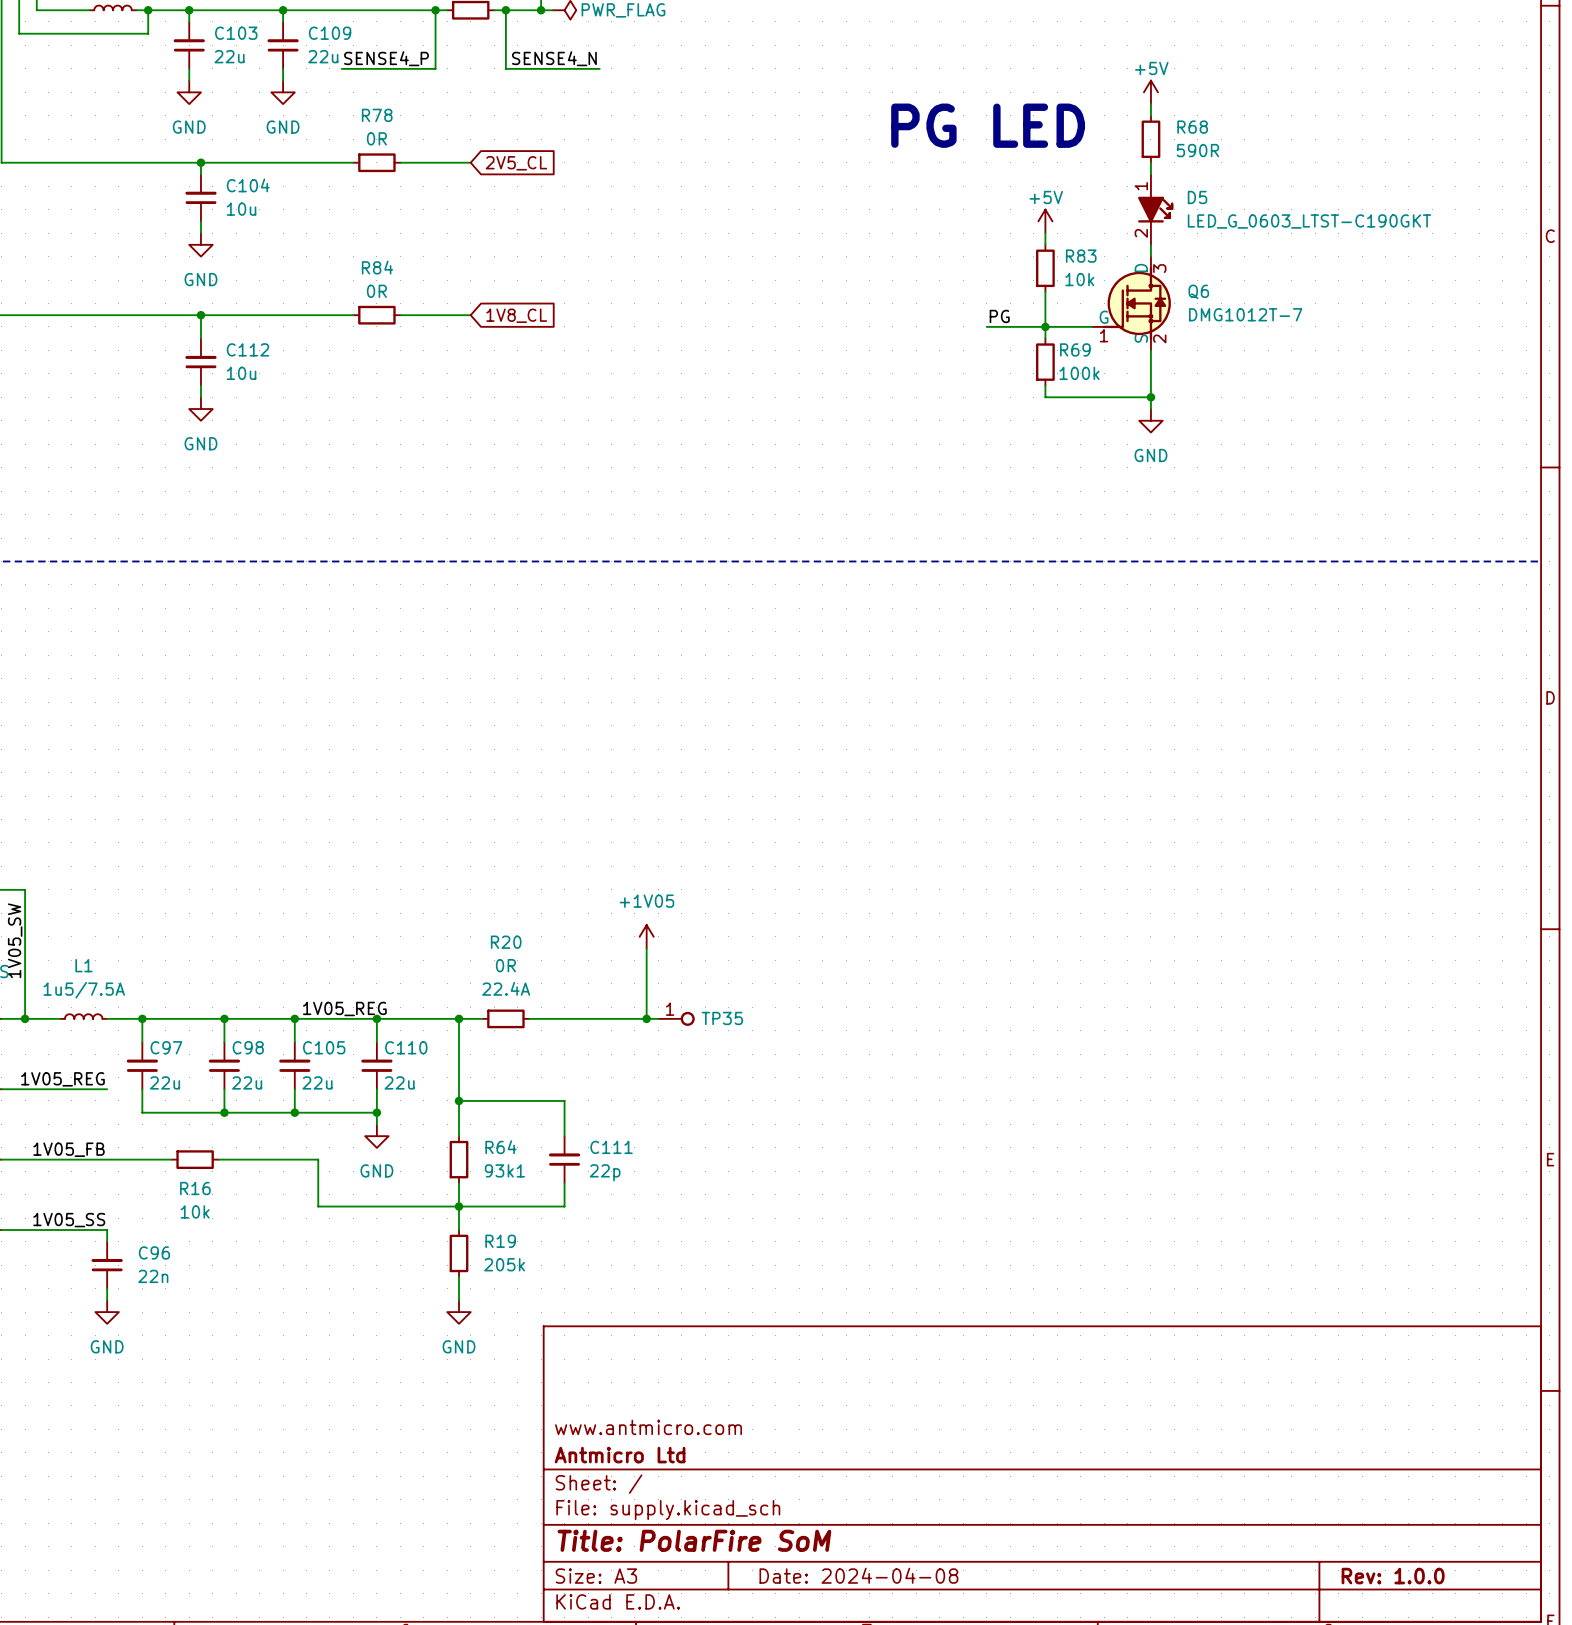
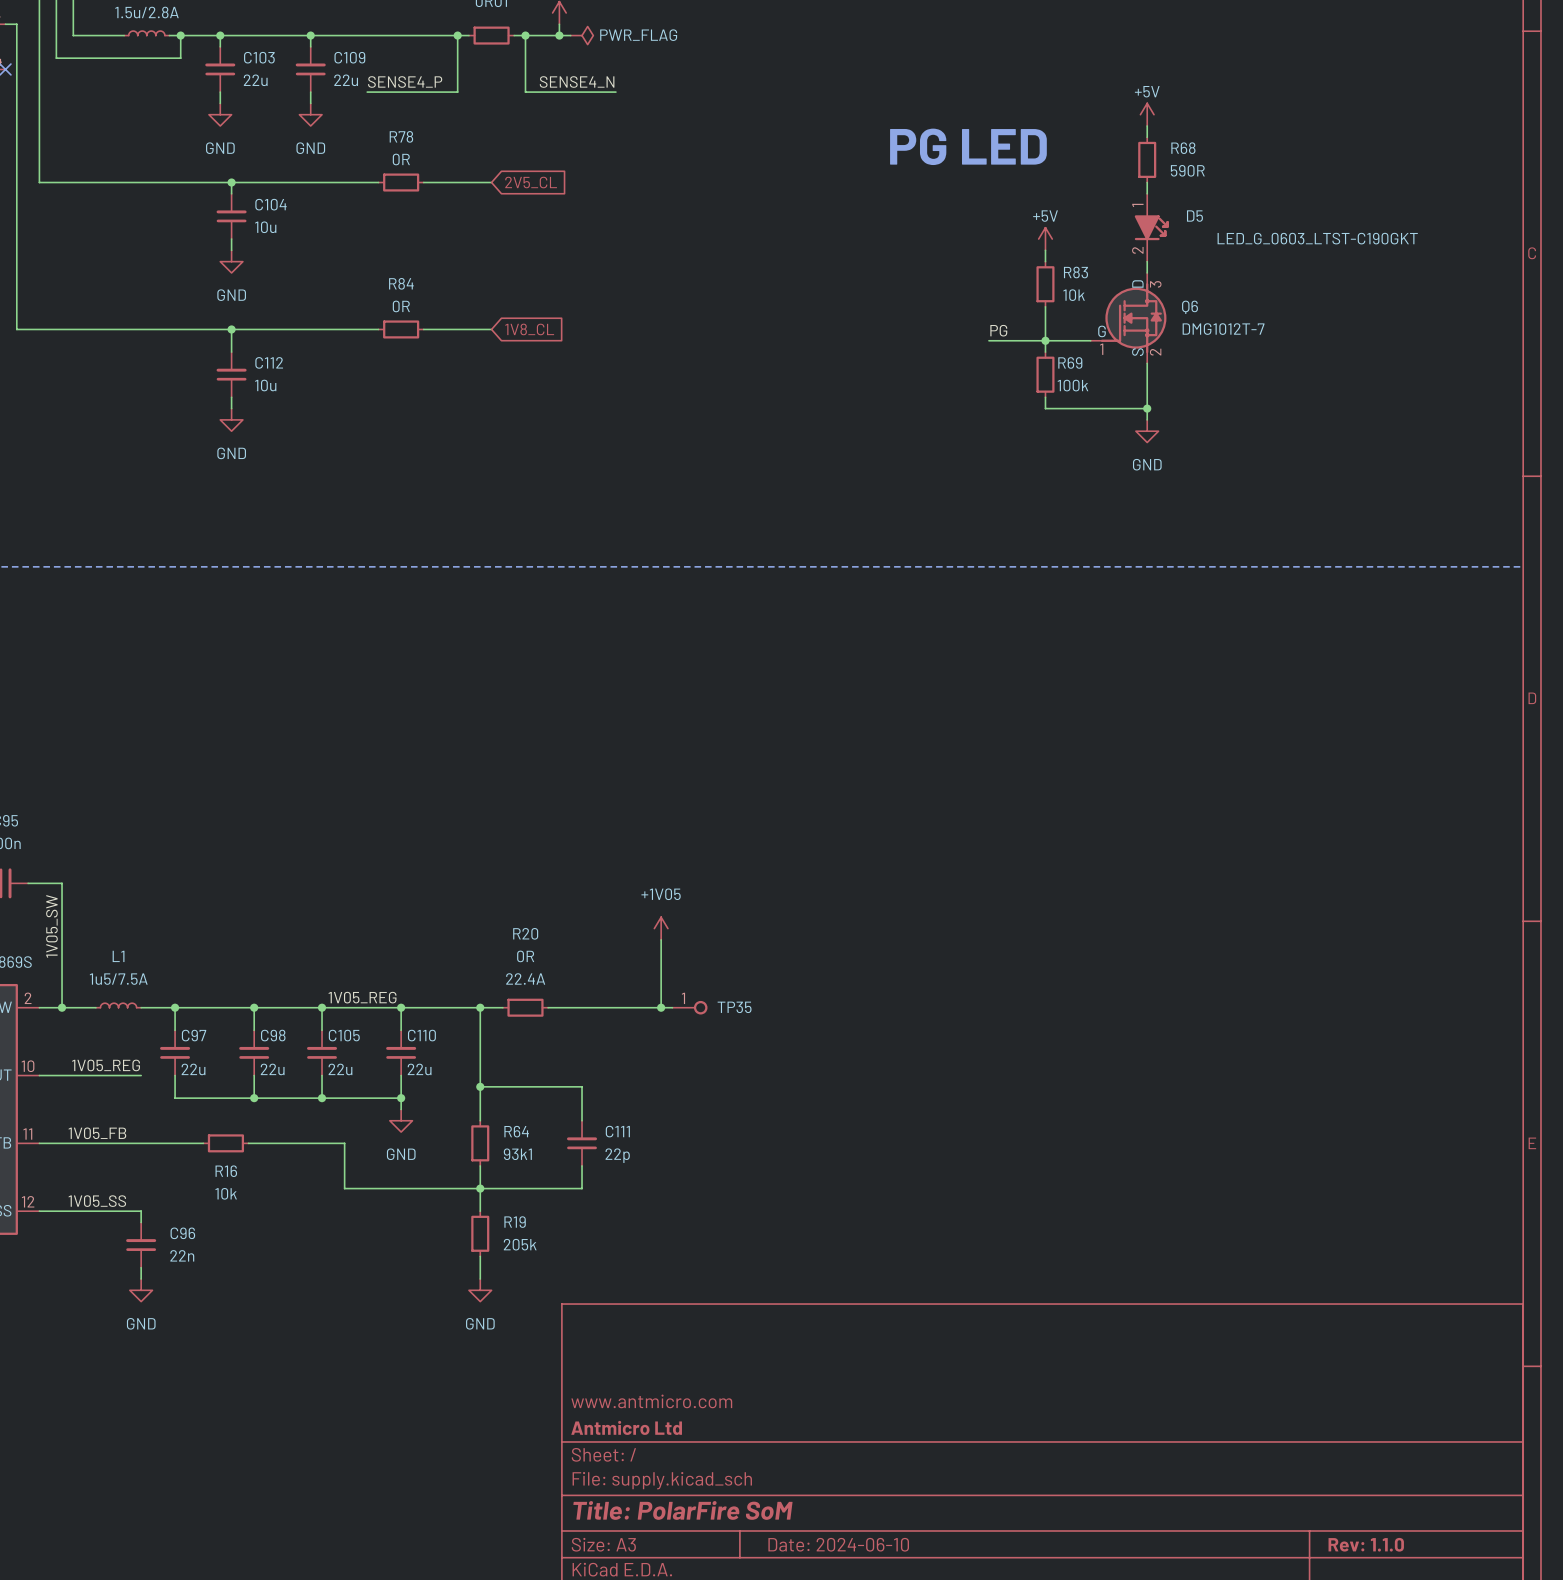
title block: Date: 2024-04-08 (858, 1575) -> Date: 2024-06-10 (838, 1544)
title block: Rev: 1.0.0 (1393, 1576) -> Rev: 1.1.0 (1366, 1544)

